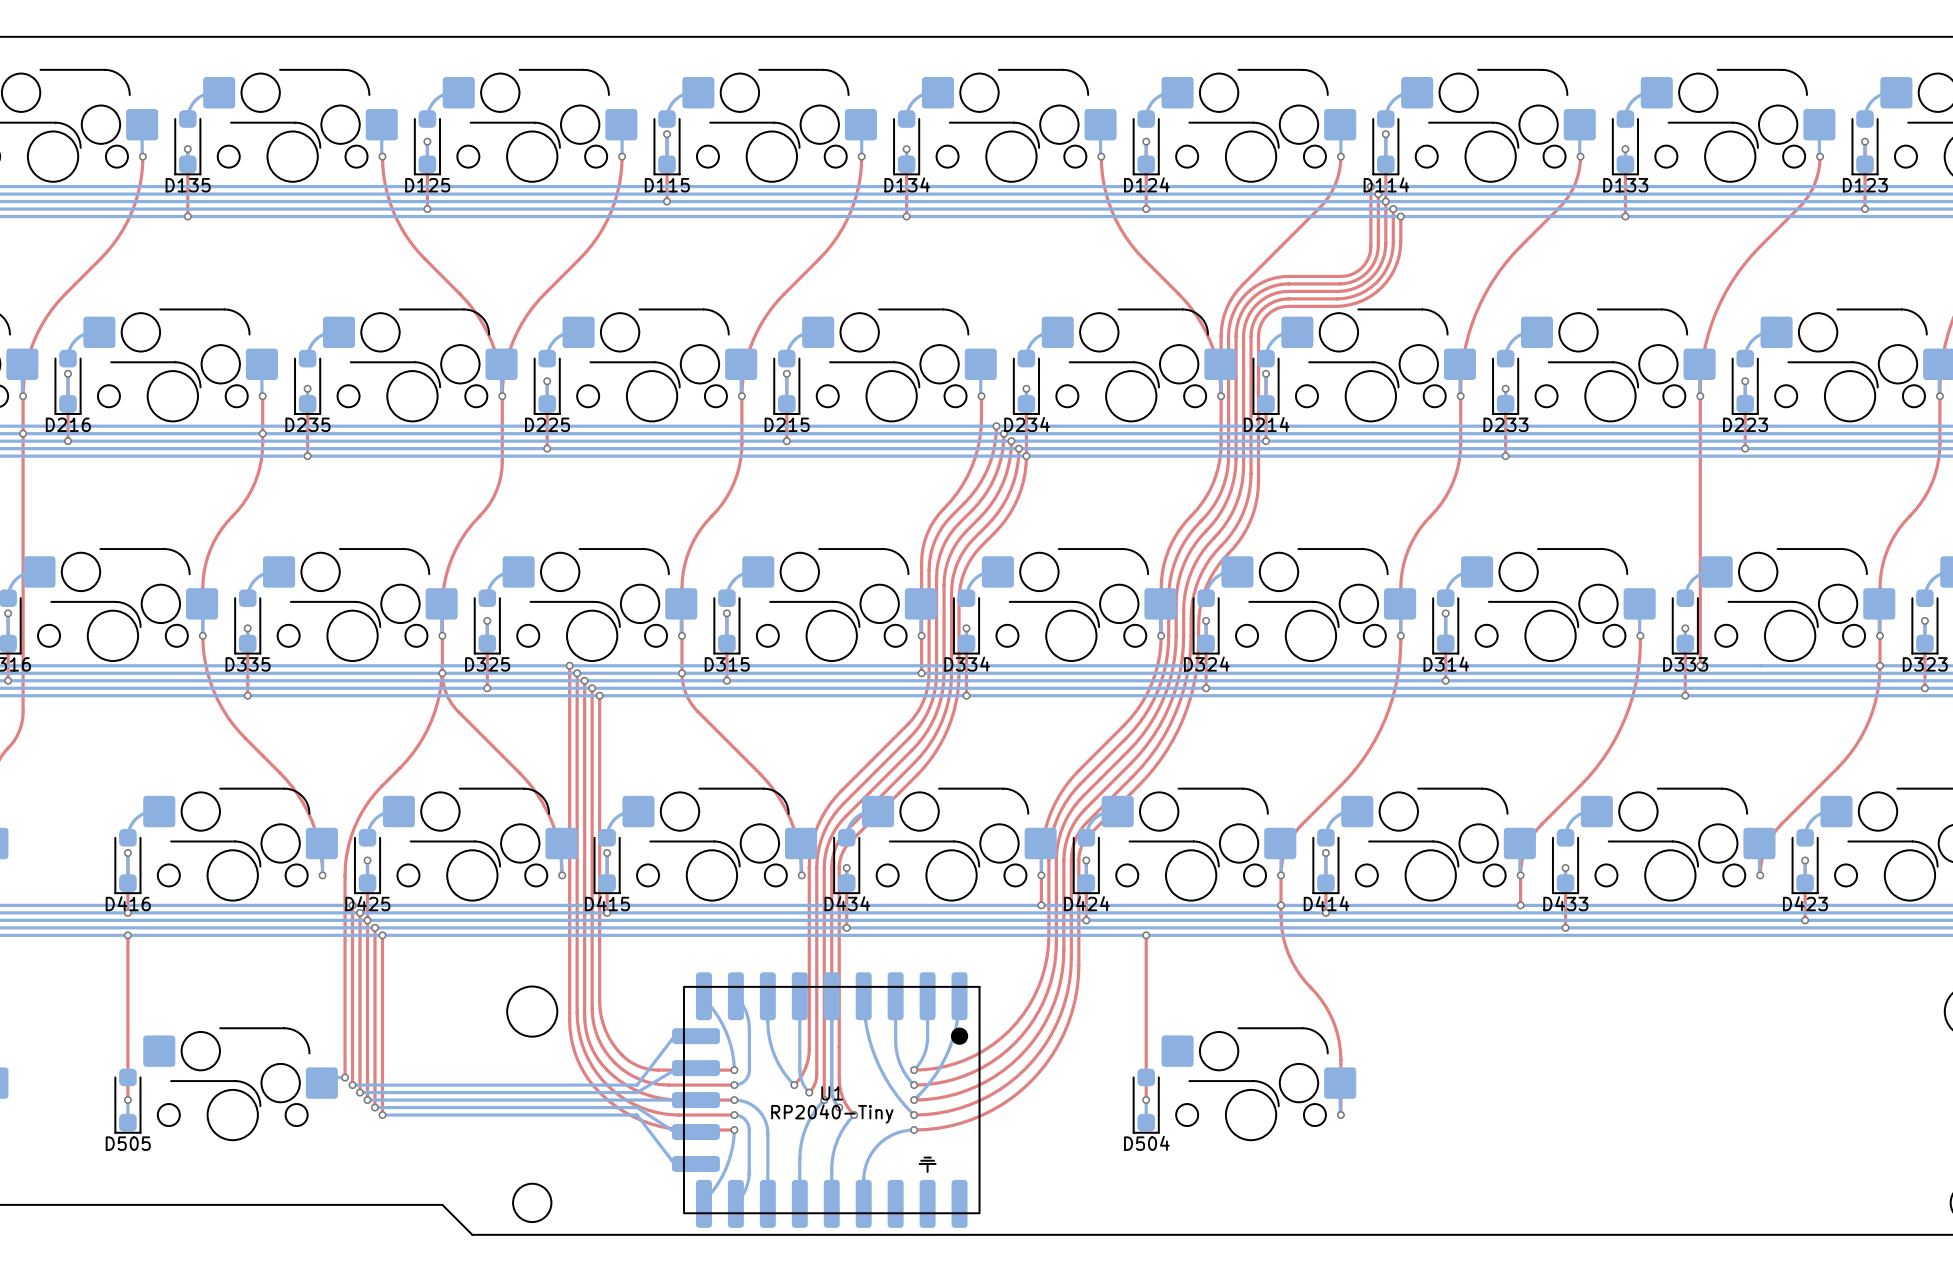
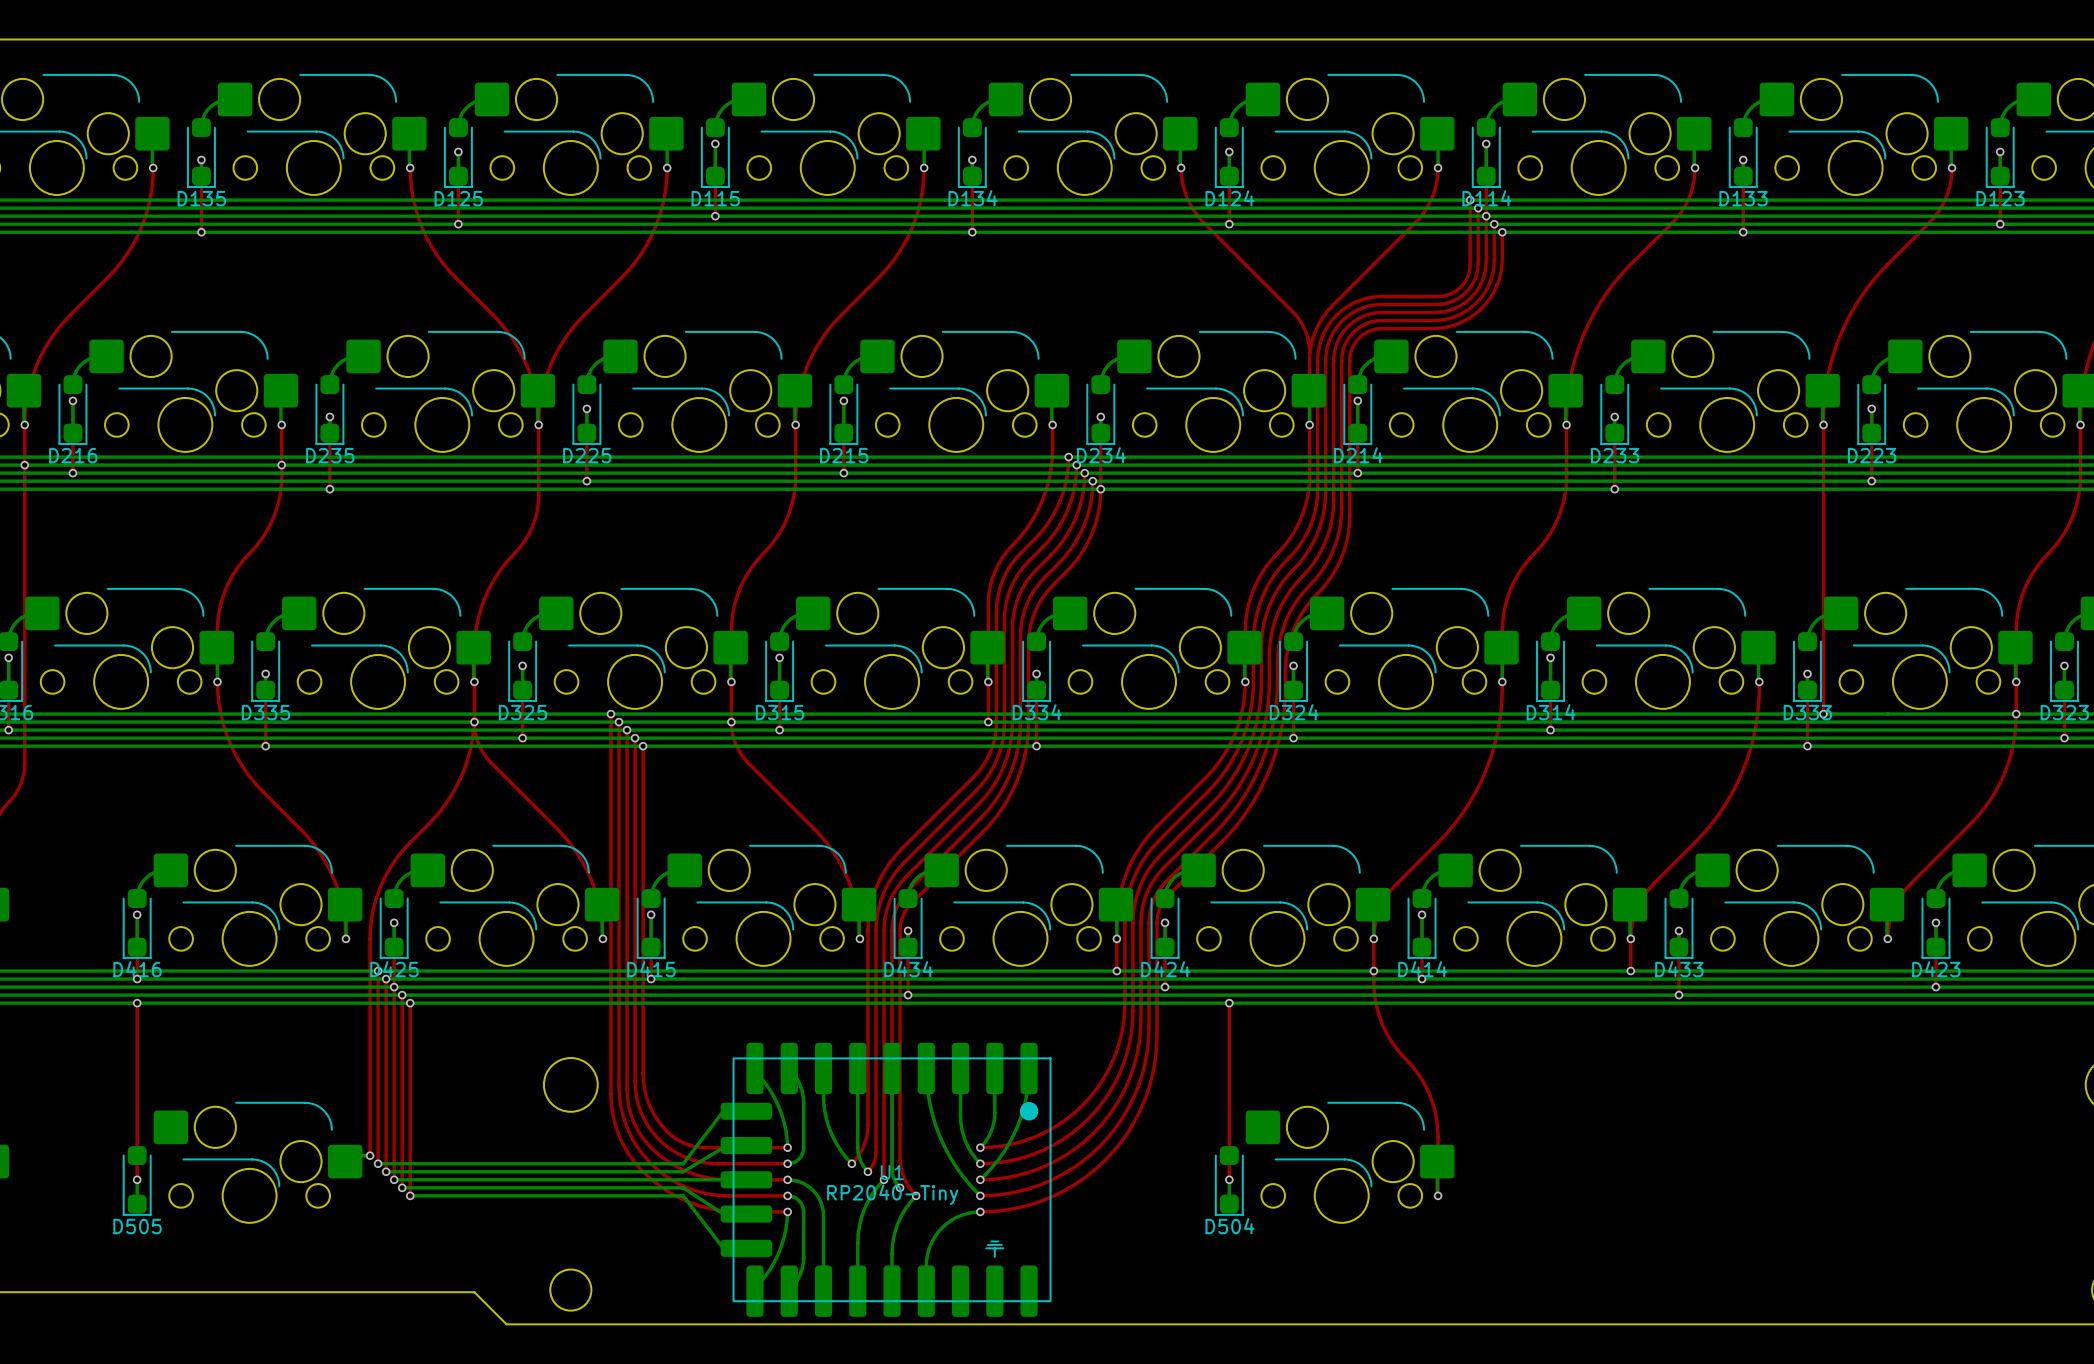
top track: (1101, 156) (1106, 194) (1120, 228) (1137, 251) (1185, 300) (1206, 332) (1218, 368) (1221, 396) -> (1181, 167) (1184, 190) (1194, 211) (1296, 315) (1305, 330) (1309, 352)

